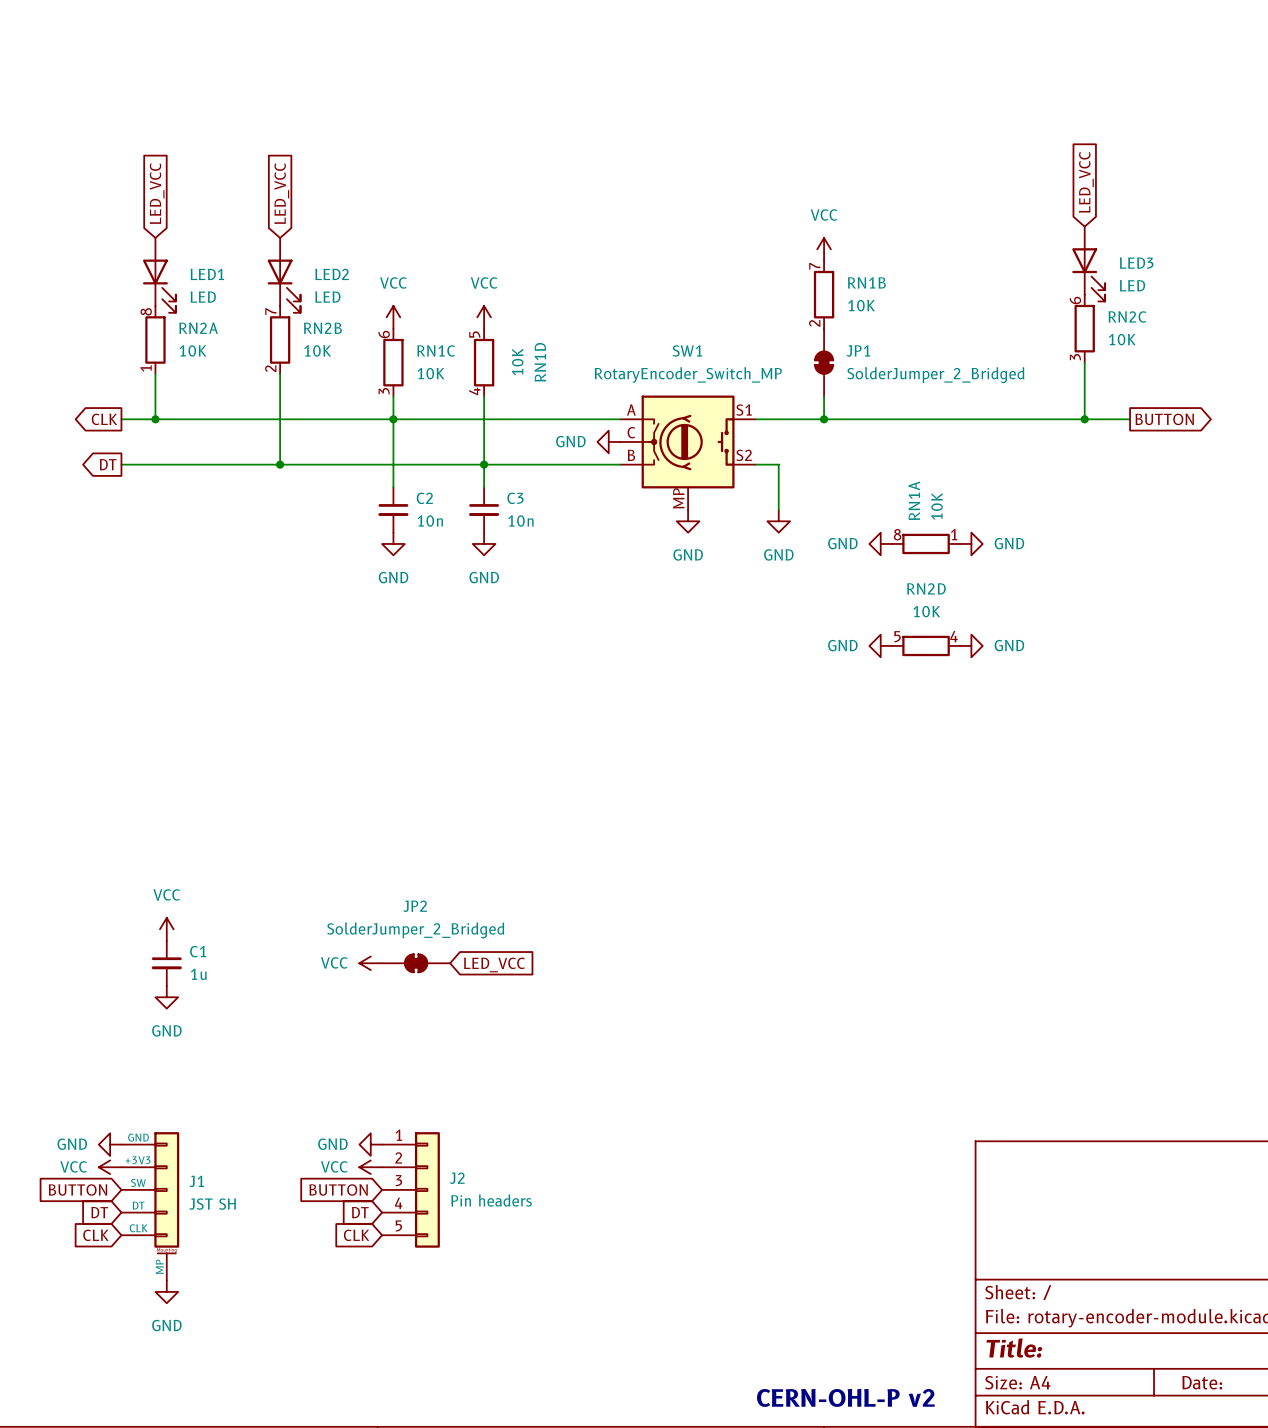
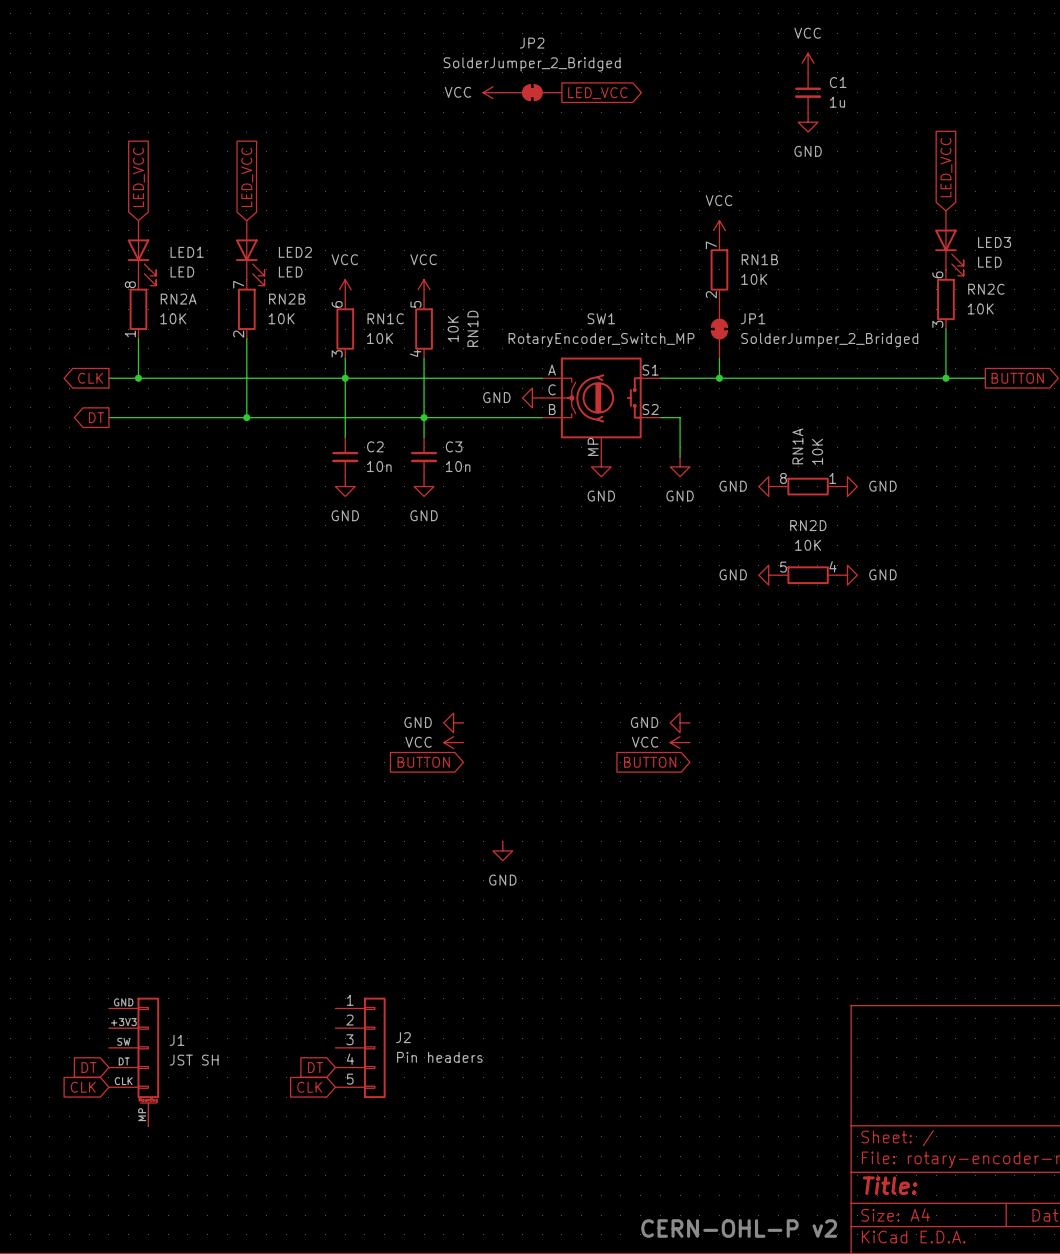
power symbol: none -> VCC (808, 63)
power symbol: none -> VCC (492, 92)
global label: none -> LED_VCC (597, 93)
power symbol: none -> GND (808, 122)
power symbol: none -> GND (453, 722)
power symbol: none -> GND (680, 722)
power symbol: none -> VCC (453, 742)
power symbol: none -> VCC (680, 742)
global label: none -> BUTTON (423, 762)
global label: none -> BUTTON (650, 762)
power symbol: VCC (166, 929) -> none
C1 position: (166, 963) -> (808, 92)
power symbol: VCC (370, 963) -> none
JP2 position: (416, 963) -> (532, 92)
power symbol: none -> GND (502, 850)
global label: LED_VCC (494, 964) -> none
power symbol: GND (166, 997) -> none
power symbol: GND (110, 1144) -> none
power symbol: GND (370, 1144) -> none
power symbol: VCC (110, 1167) -> none
power symbol: VCC (370, 1167) -> none
global label: BUTTON (77, 1189) -> none
global label: BUTTON (338, 1189) -> none
power symbol: GND (166, 1291) -> none

